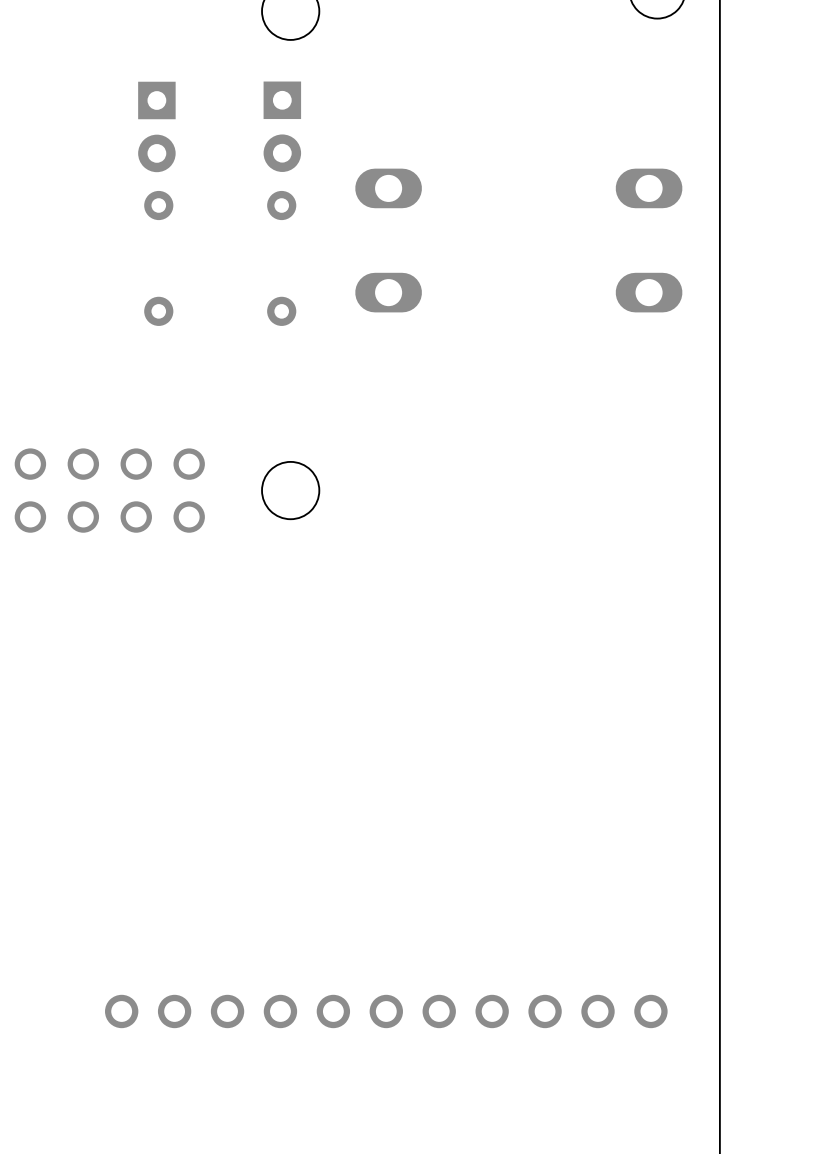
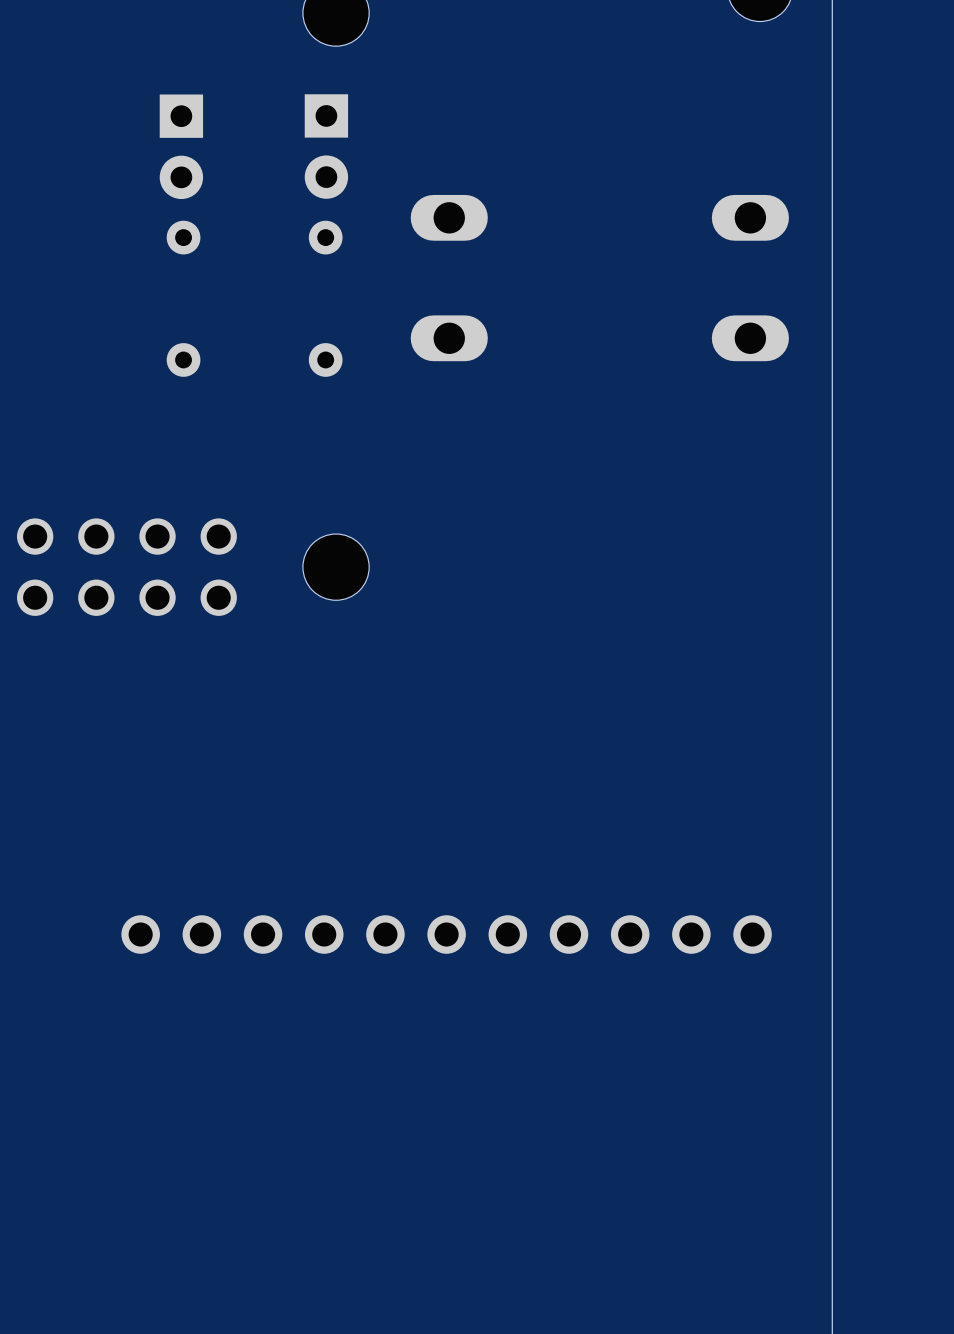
part position: (386, 1011) -> (446, 934)

